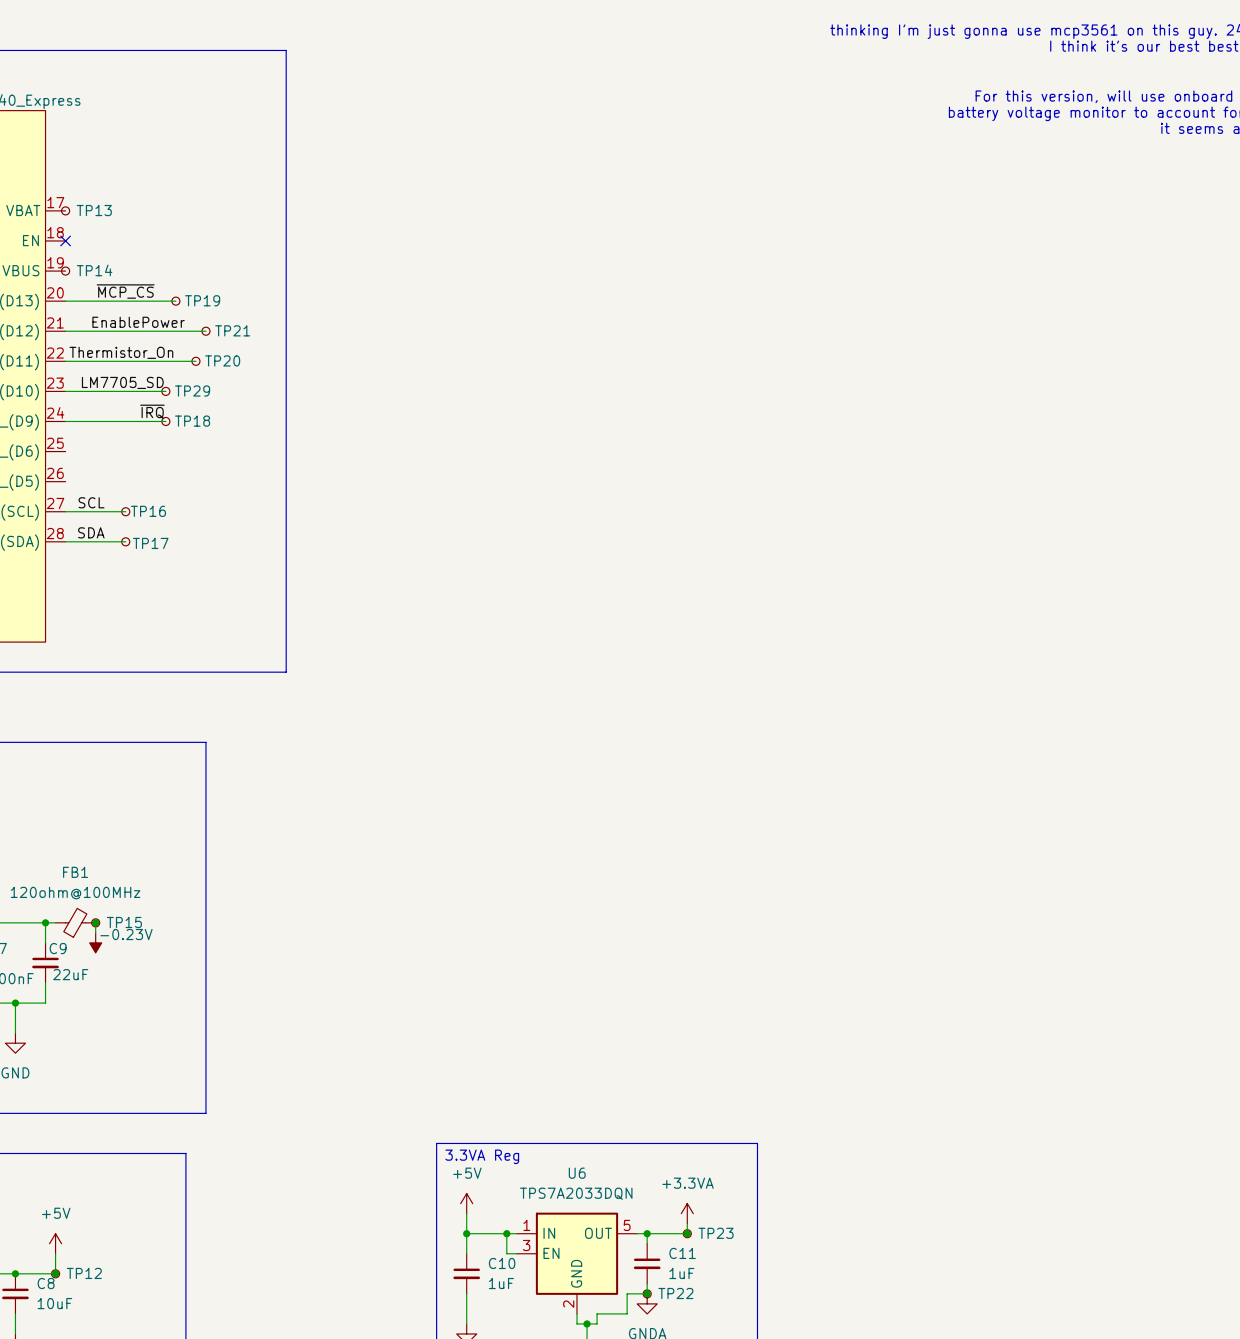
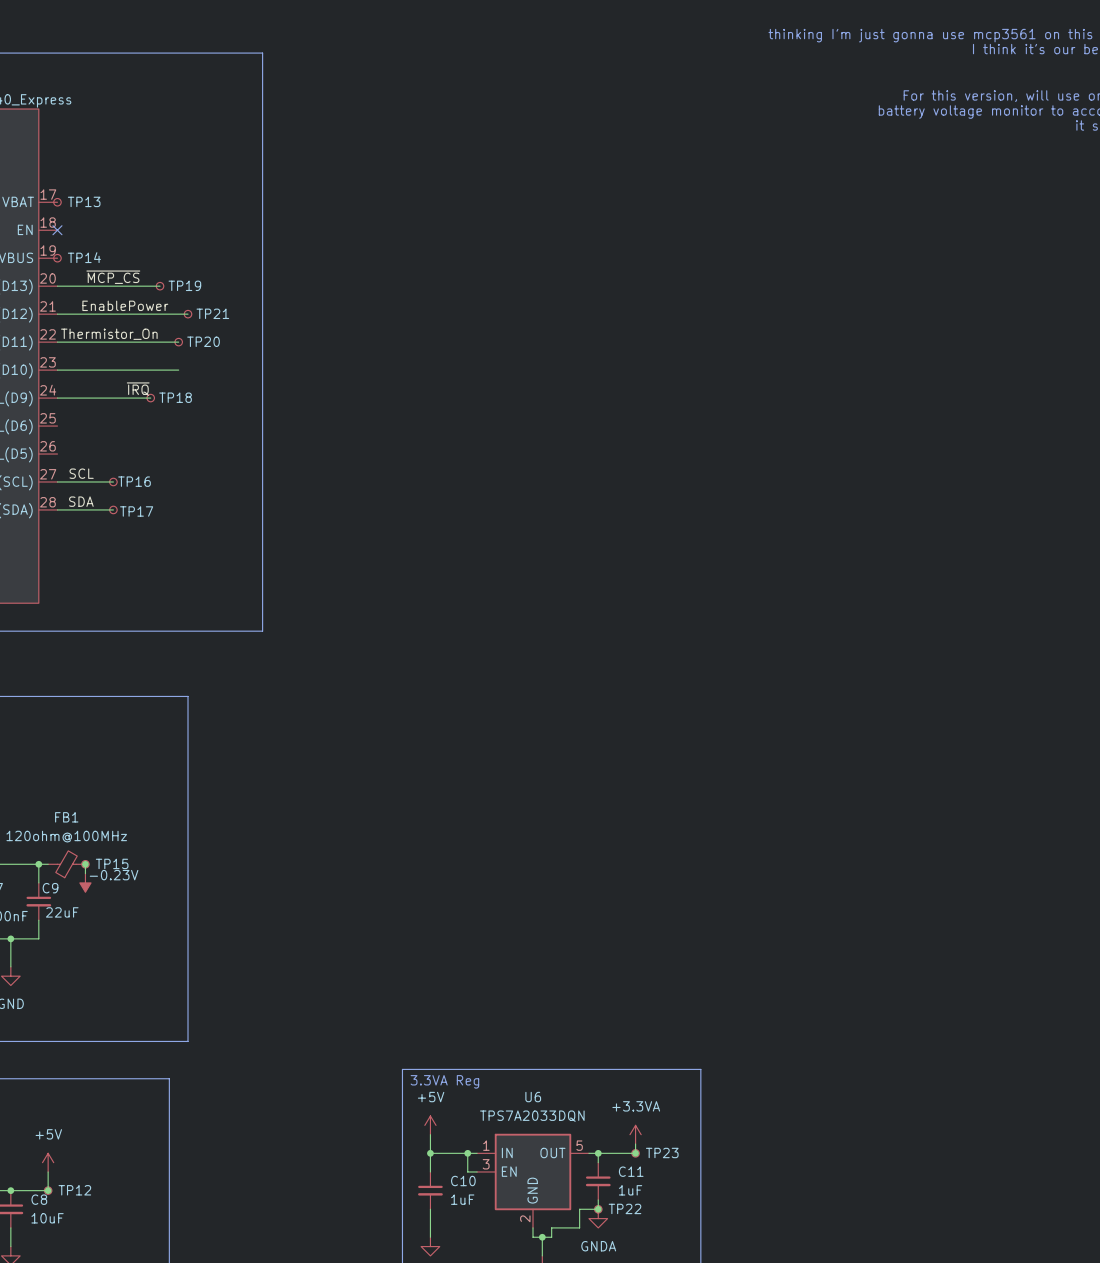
label: LM7705_SD (122, 382) -> none
wire: none -> (150, 370) (178, 370)
TP29: (165, 391) -> none

